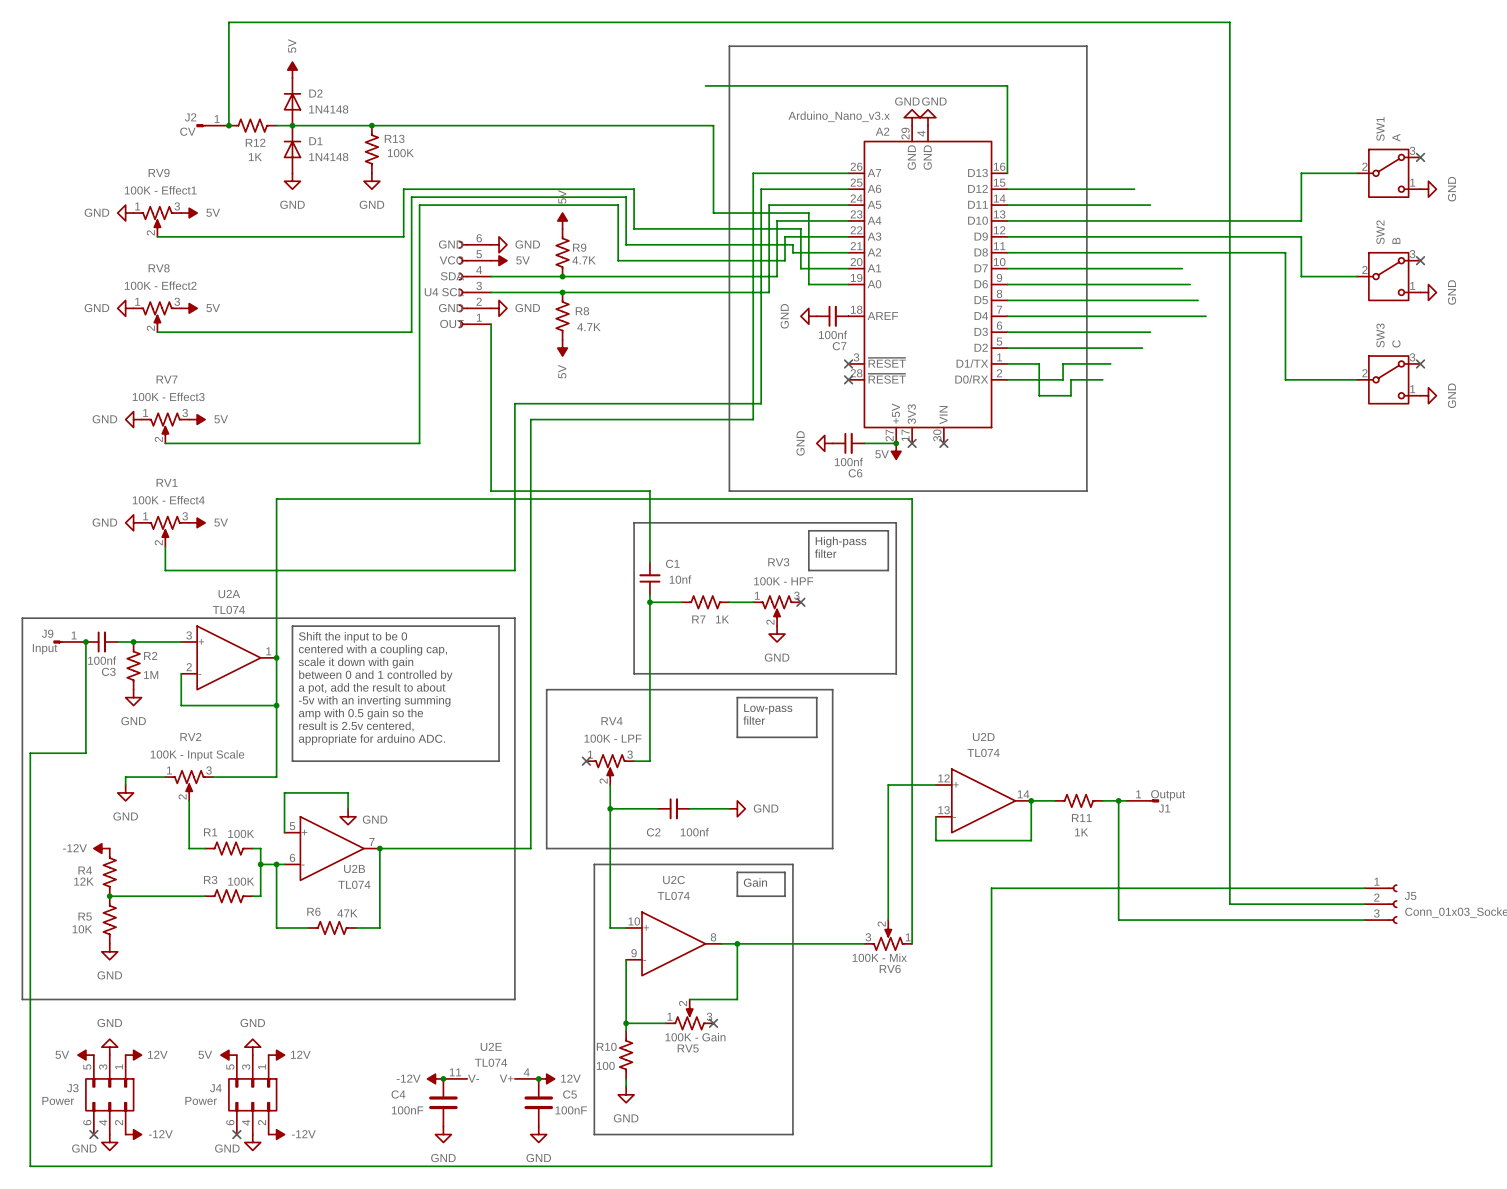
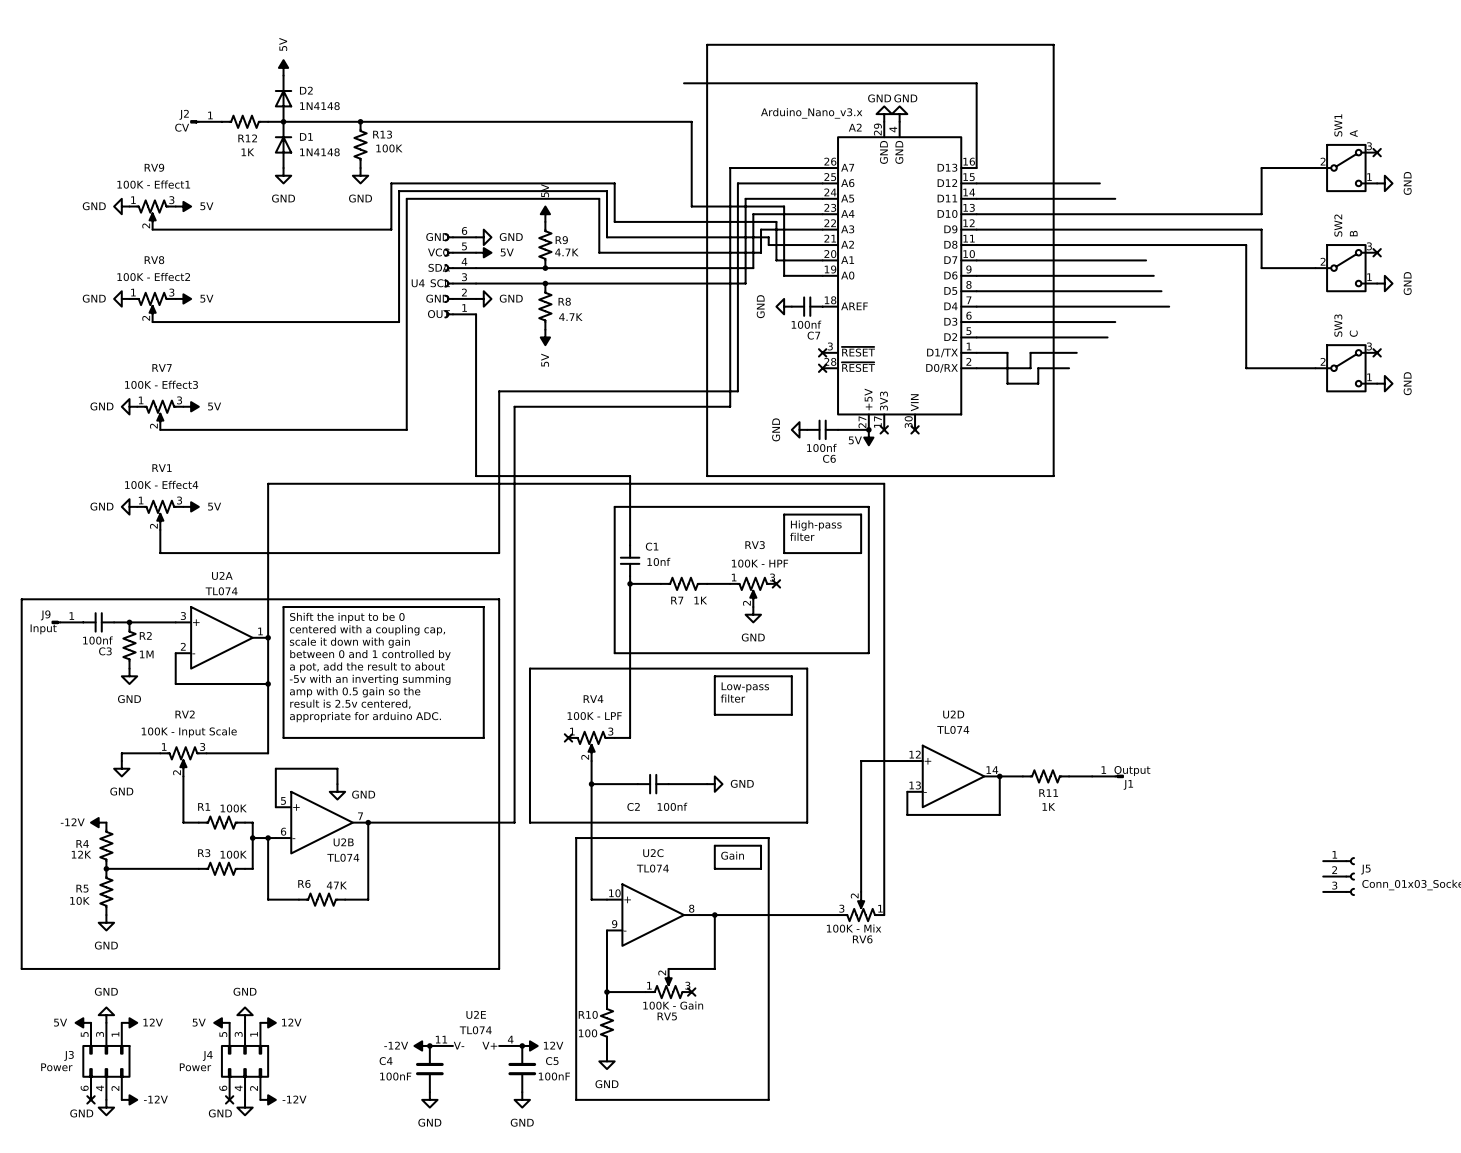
wire: (228, 125) (228, 22) (1229, 22) (1229, 904) (1364, 904) -> none
junction: (228, 125) -> none
wire: (85, 642) (85, 753) (30, 753) (30, 1166) (991, 1166) (991, 888) (1364, 888) -> none
junction: (85, 642) -> none
wire: (1118, 800) (1118, 920) (1364, 920) -> none
junction: (1118, 800) -> none

